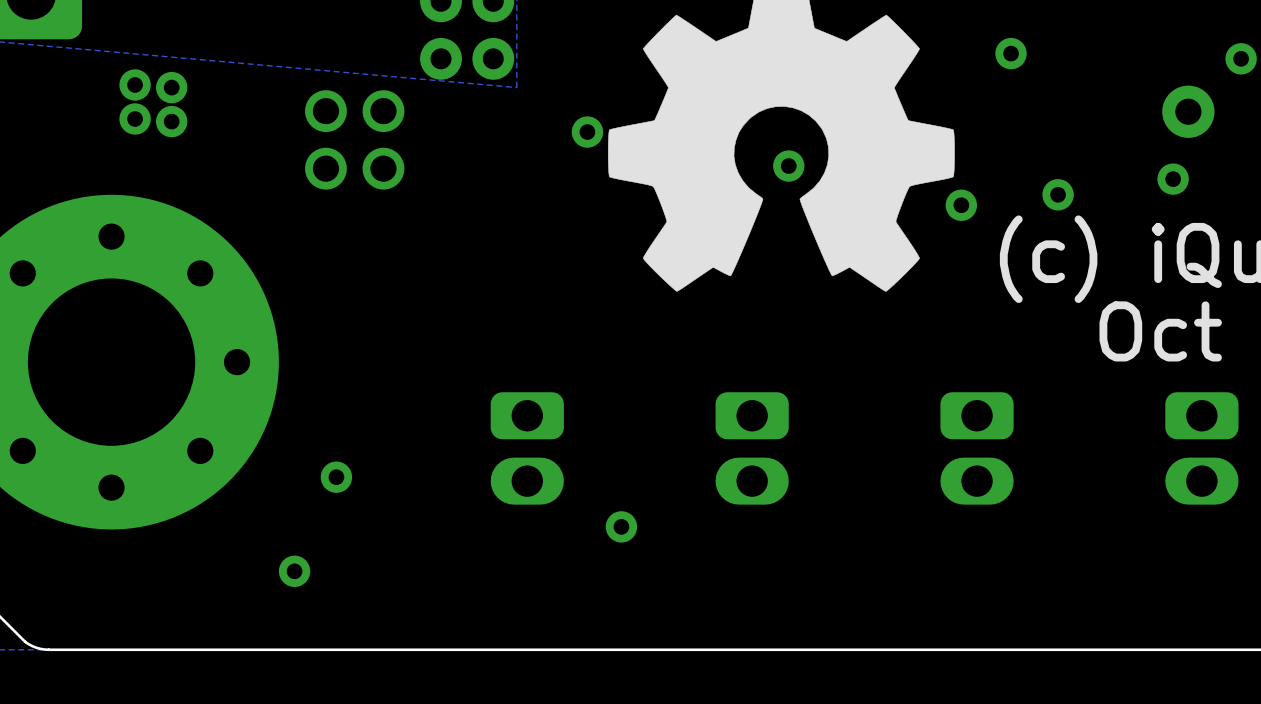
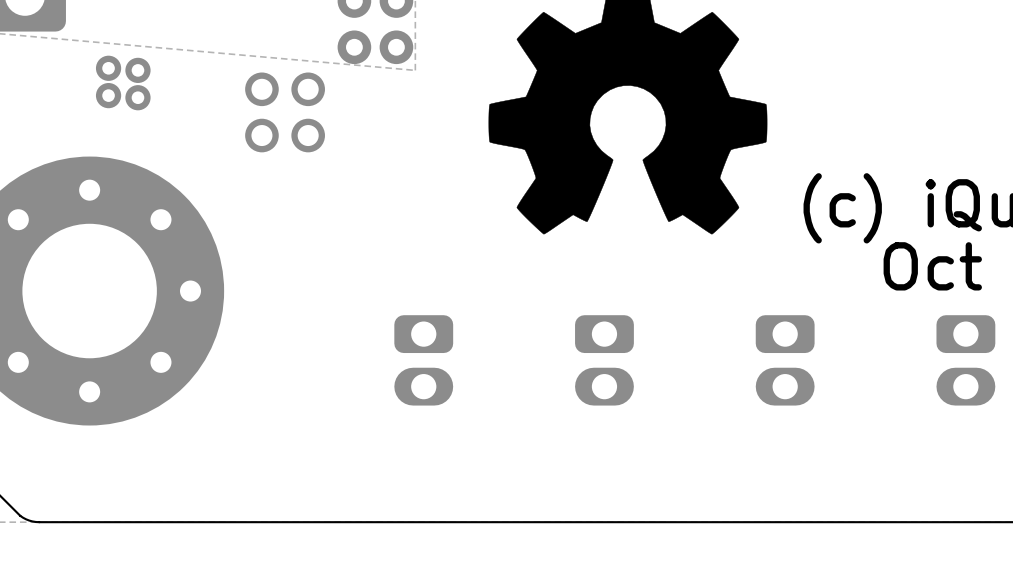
via: (1011, 53) -> none
via: (1241, 58) -> none
via: (1188, 111) -> none
via: (587, 132) -> none
via: (788, 166) -> none
via: (1173, 179) -> none
via: (1058, 194) -> none
via: (961, 205) -> none
via: (336, 477) -> none
via: (621, 526) -> none
via: (294, 571) -> none

